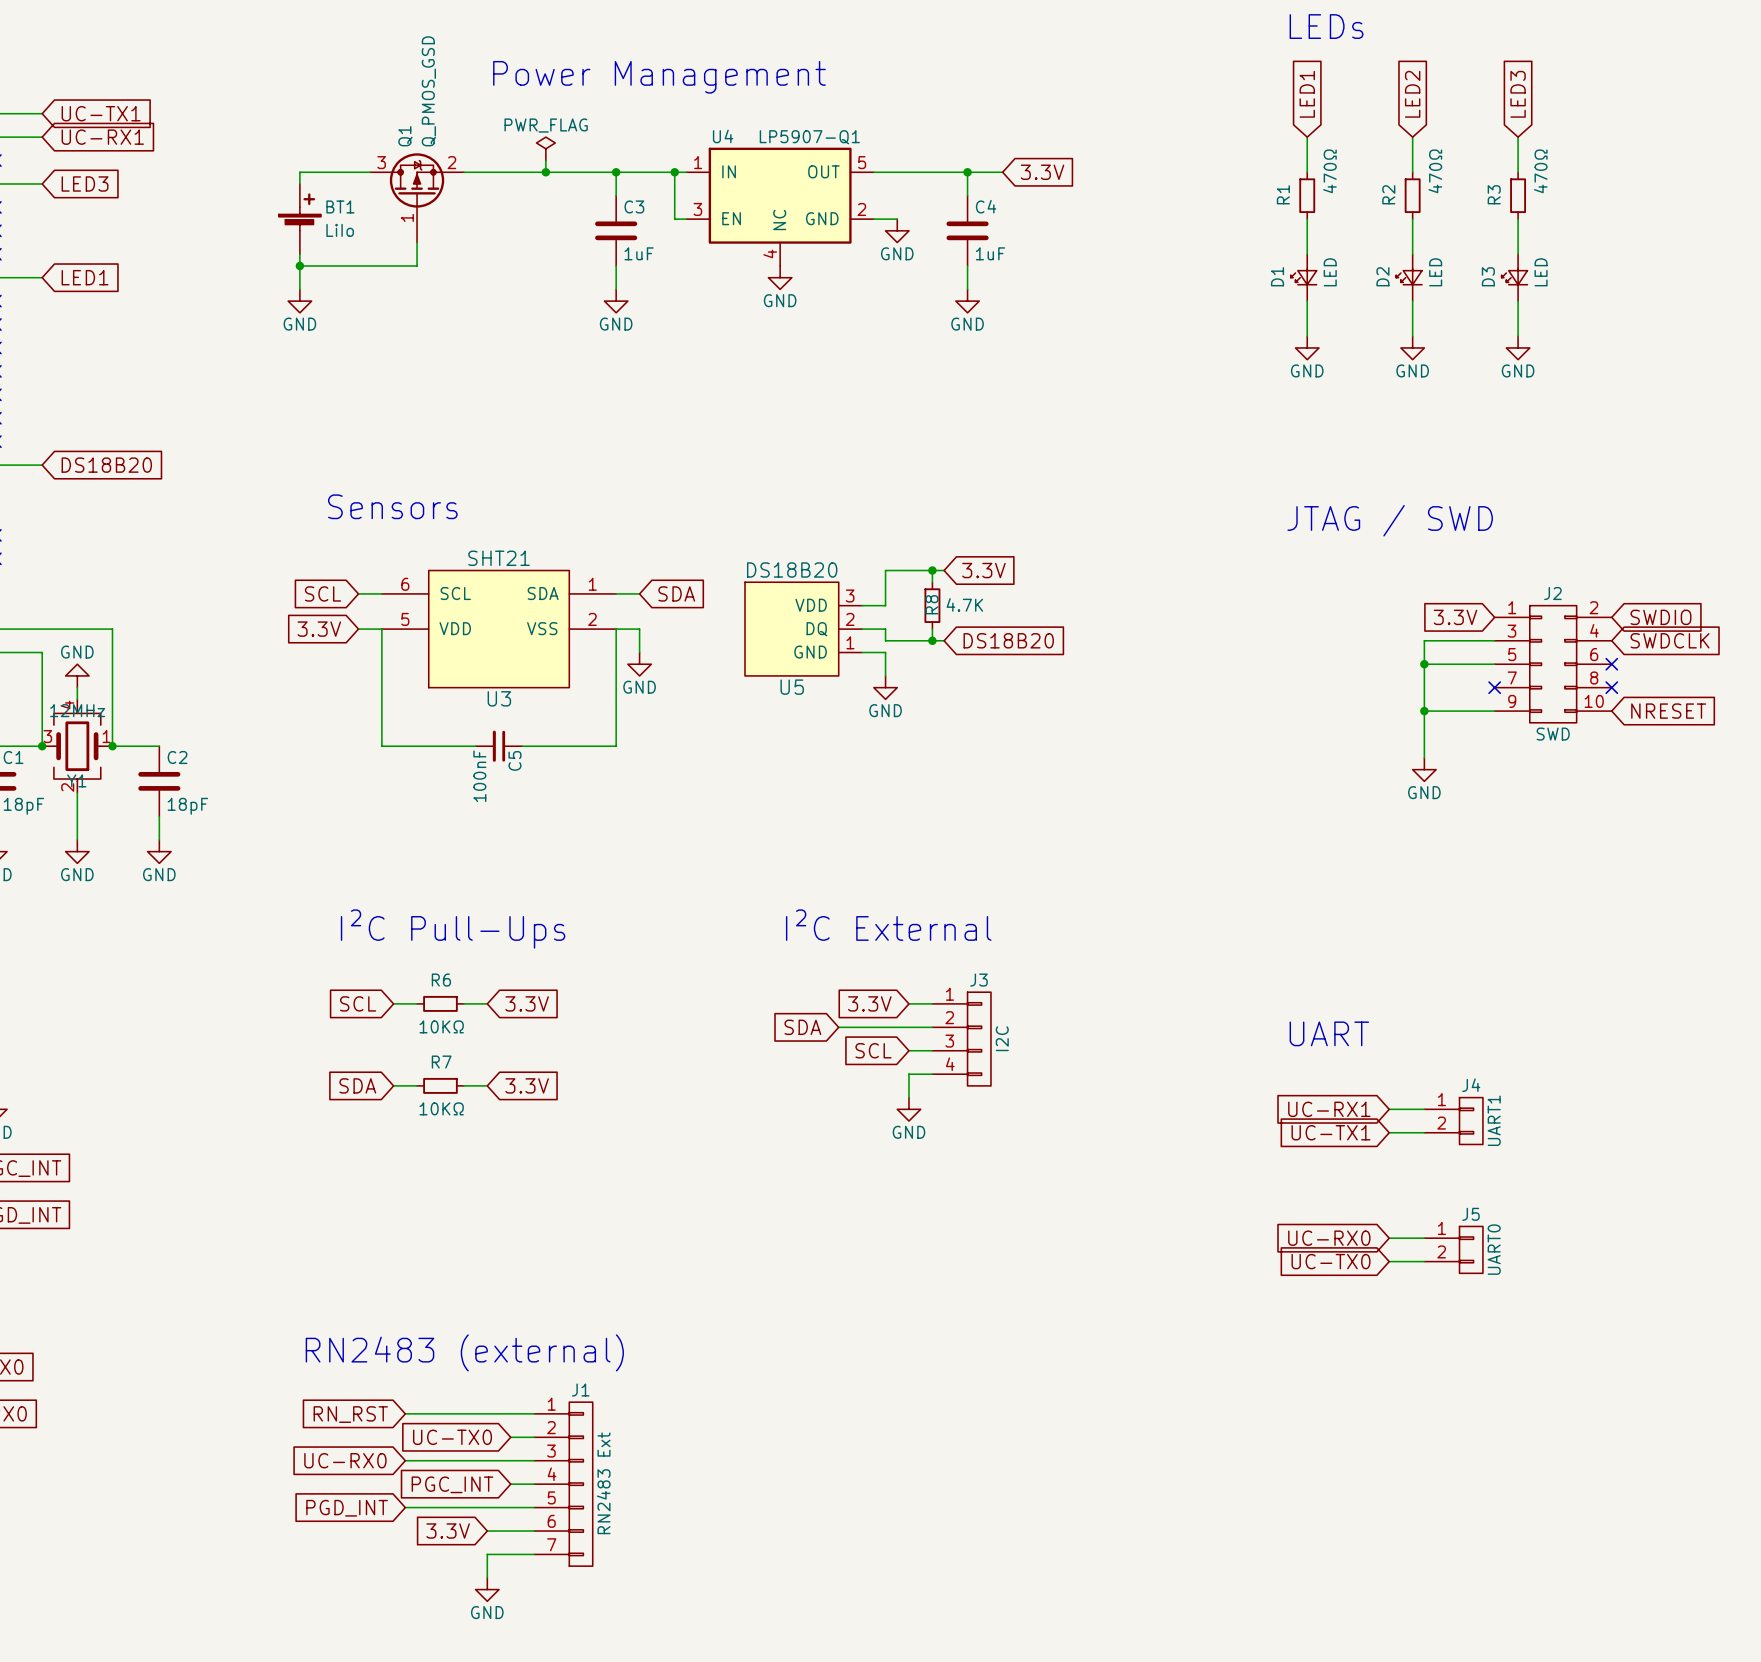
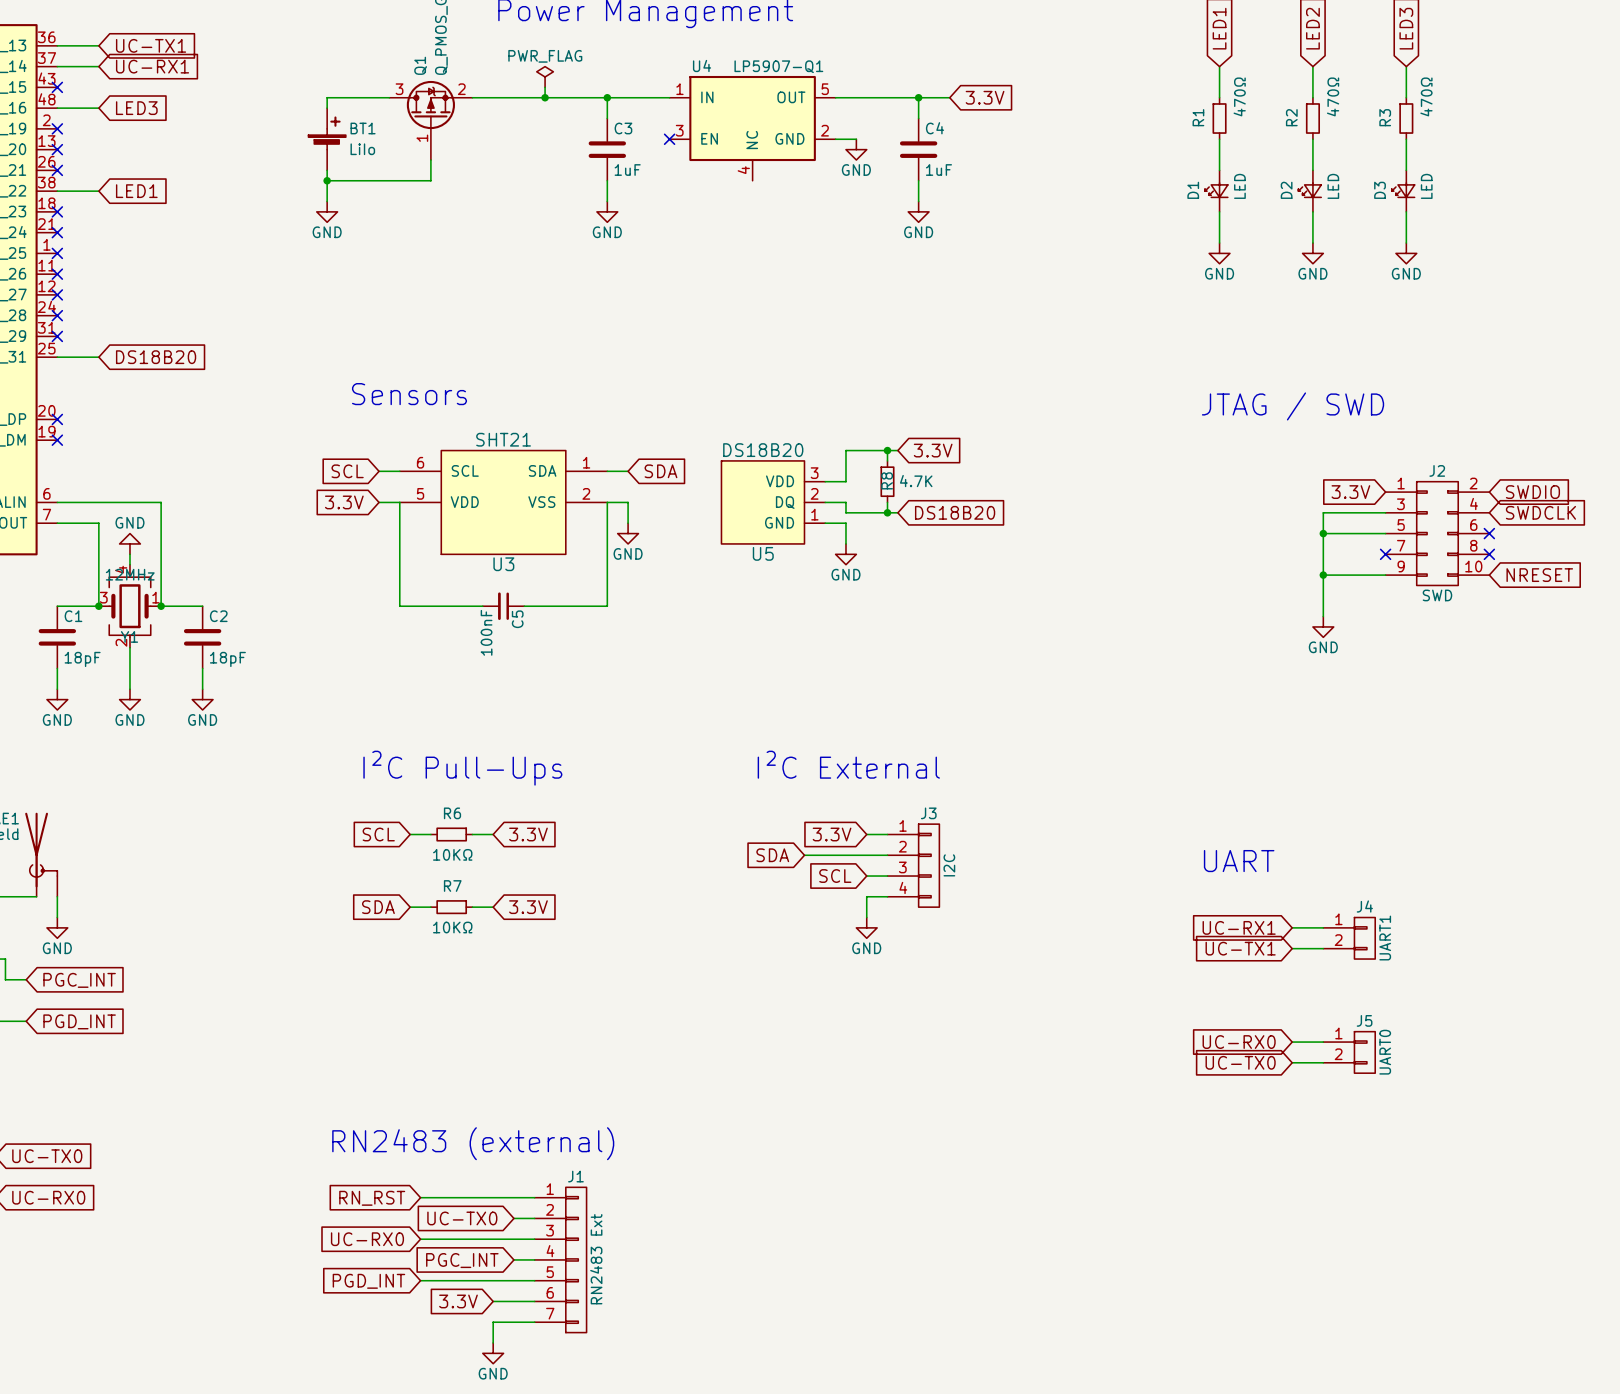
wire: (674, 172) (674, 219) (686, 219) -> none
junction: (674, 172) -> none
no-connect mark: none -> (669, 139)
power symbol: GND (780, 277) -> none

